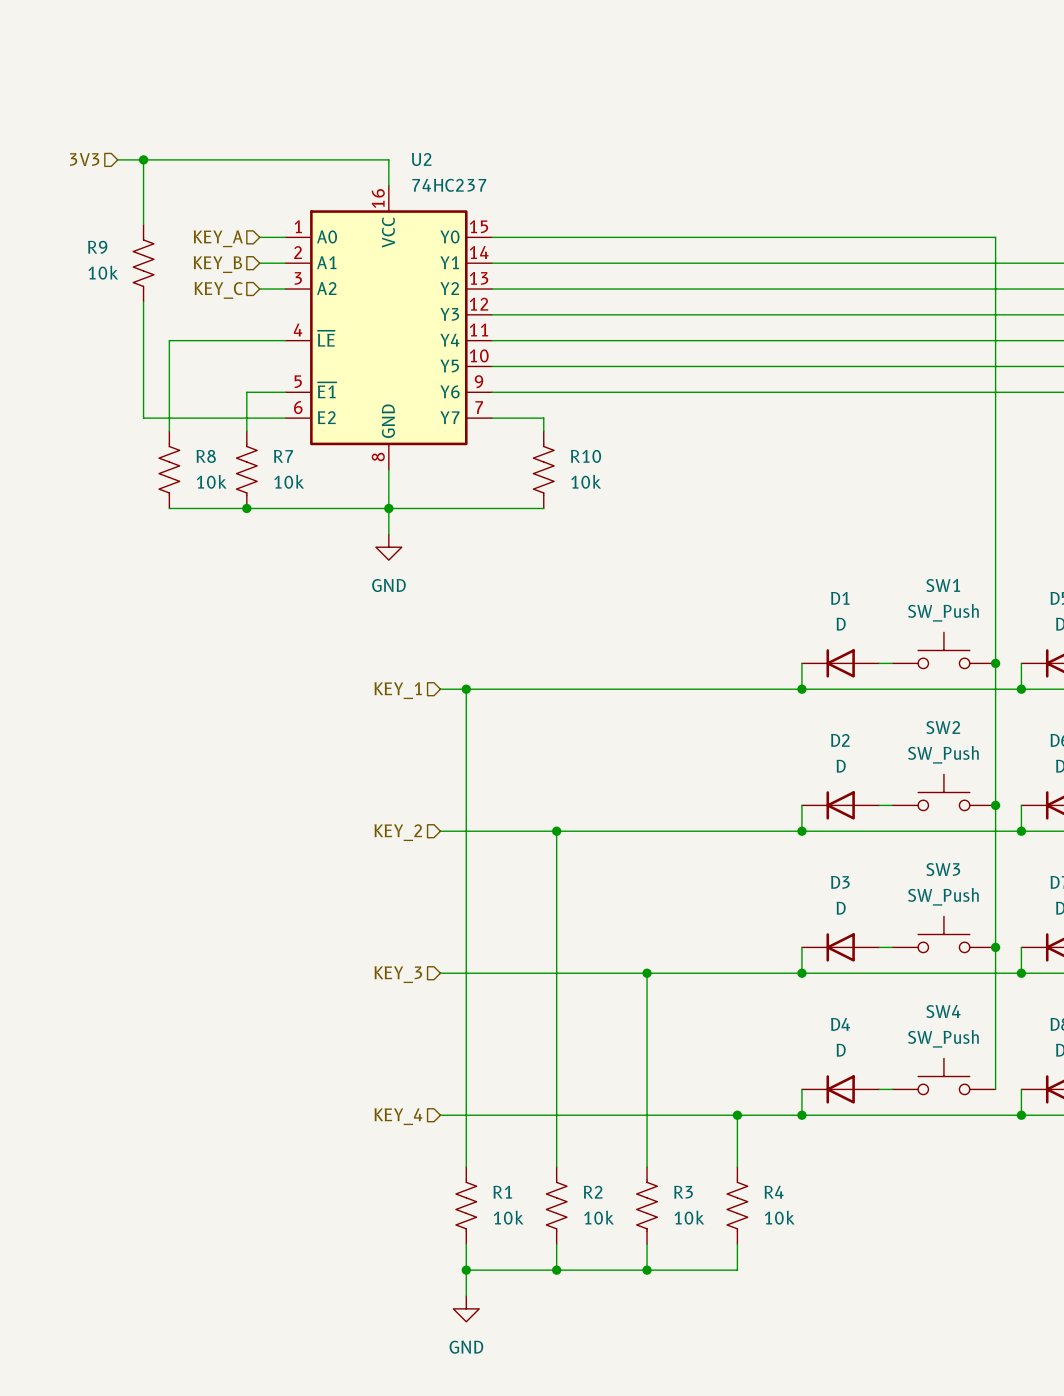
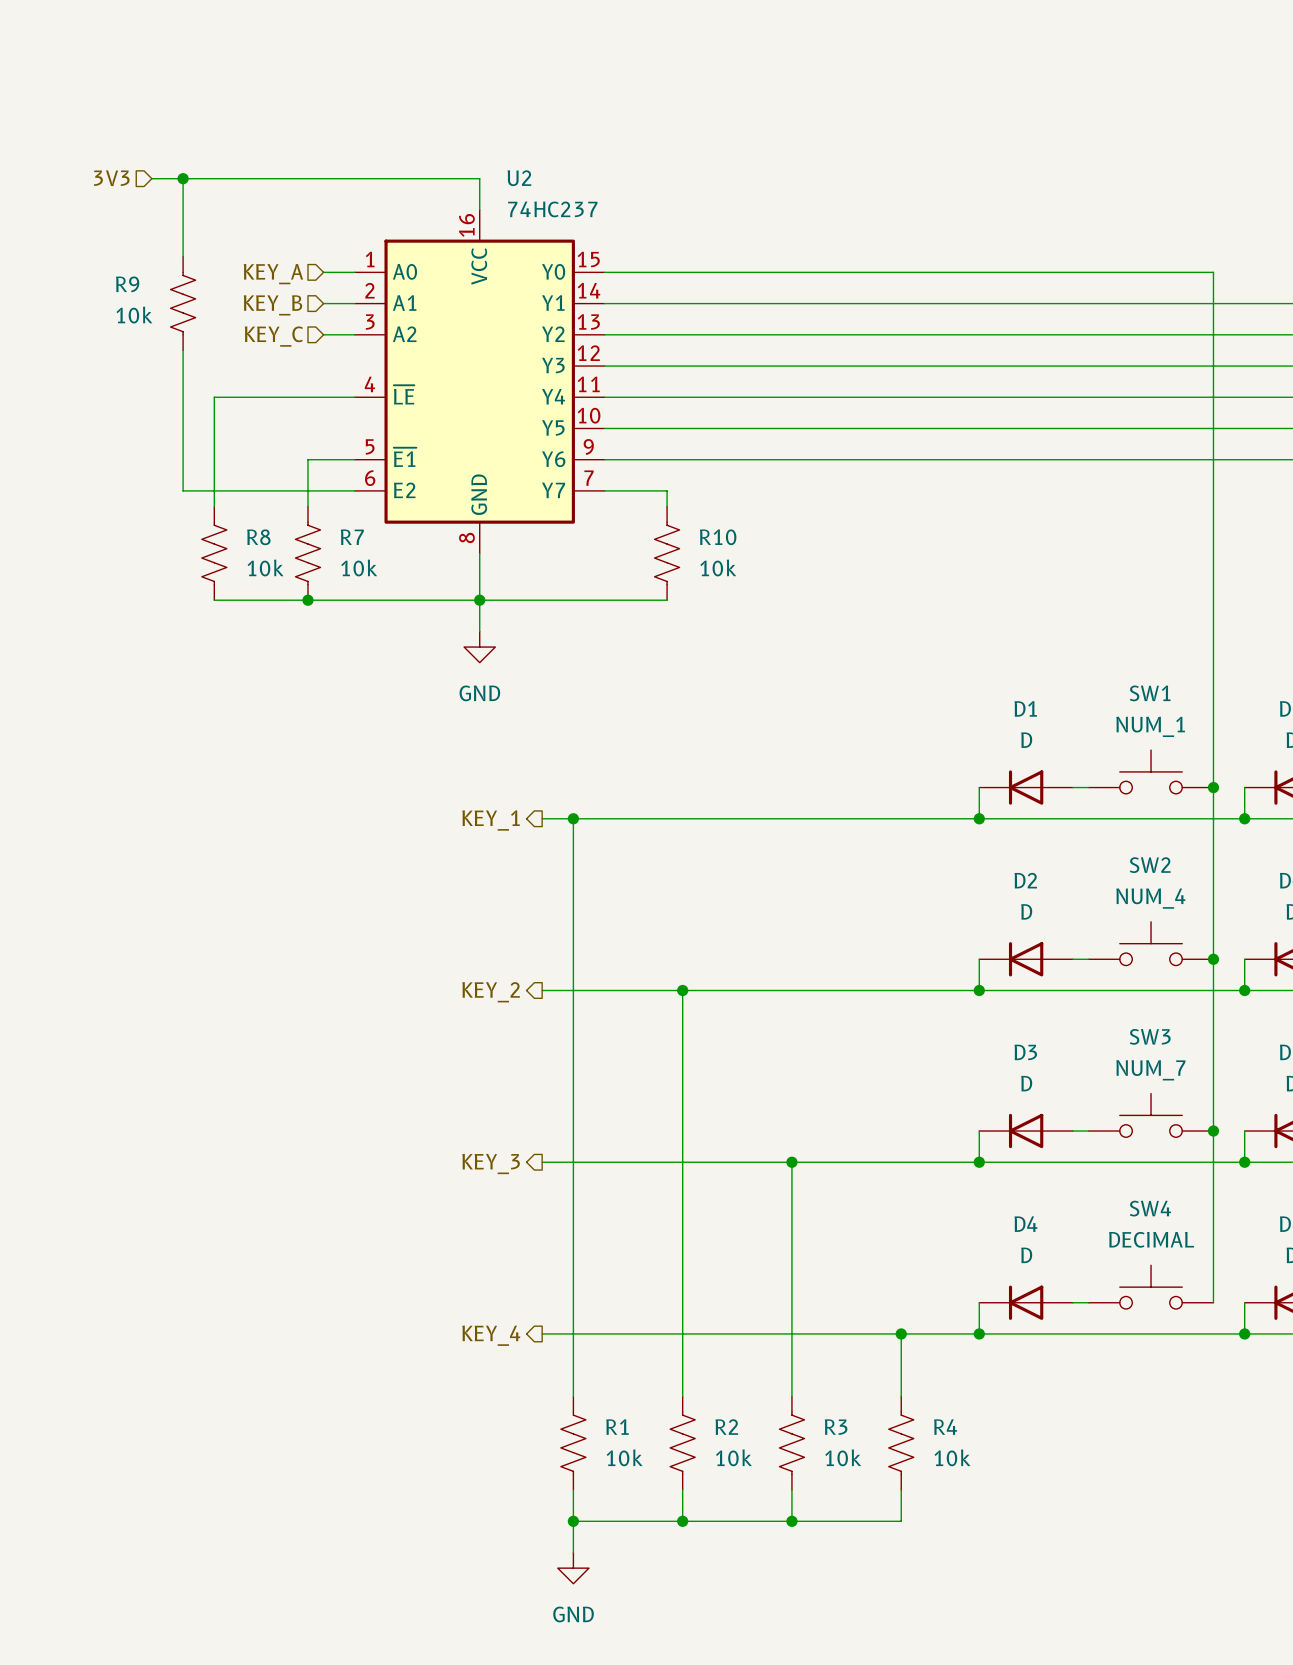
SW1 value: SW_Push (943, 612) -> NUM_1 (1150, 726)
hierarchical label shape: input (398, 690) -> output (491, 820)
SW2 value: SW_Push (943, 754) -> NUM_4 (1150, 898)
hierarchical label shape: input (398, 832) -> output (491, 992)
SW3 value: SW_Push (943, 896) -> NUM_7 (1150, 1070)
hierarchical label shape: input (398, 974) -> output (491, 1163)
SW4 value: SW_Push (943, 1038) -> DECIMAL (1151, 1239)
hierarchical label shape: input (398, 1116) -> output (491, 1335)

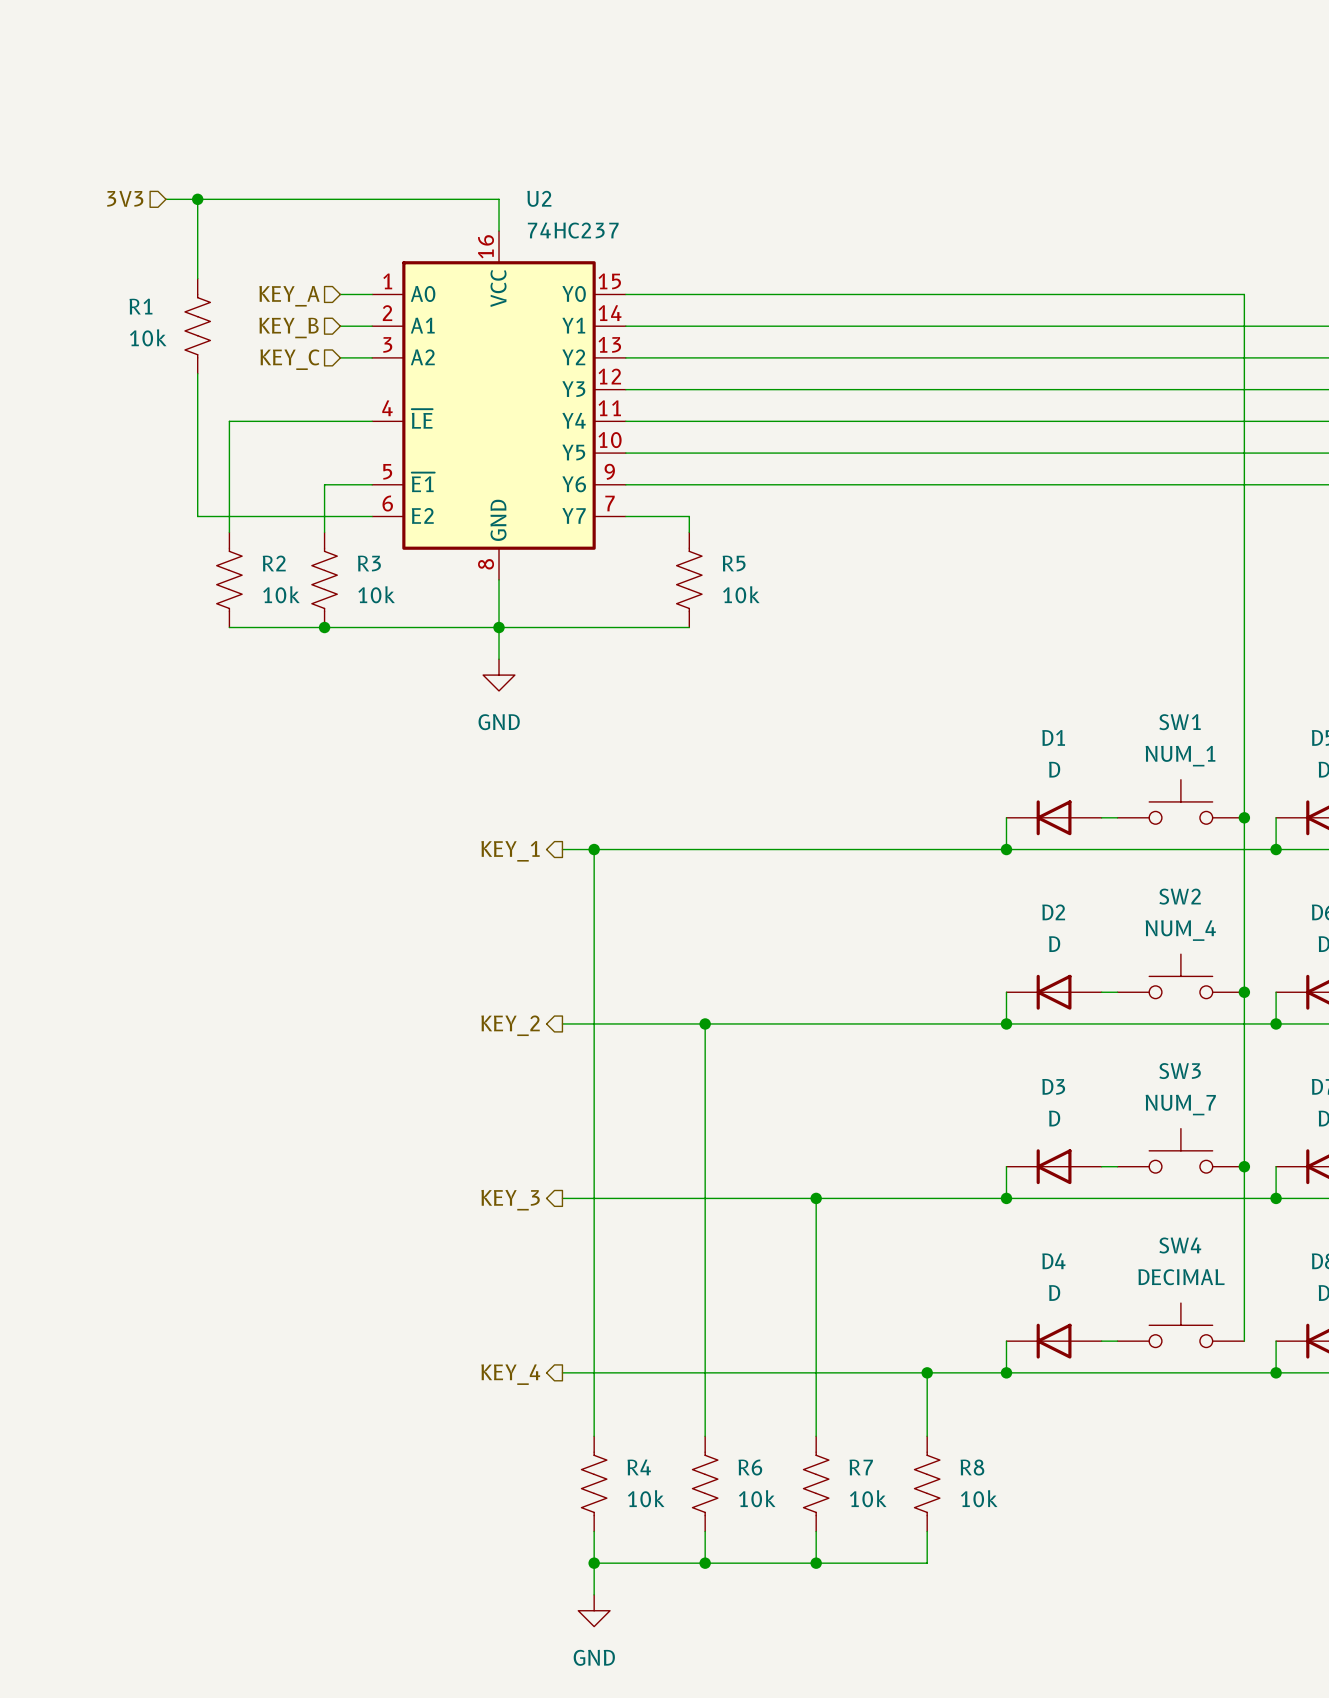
R9 name: R9 (127, 284) -> R1 (140, 306)
R8 name: R8 (258, 537) -> R2 (274, 563)
R7 name: R7 (352, 537) -> R3 (369, 563)
R10 name: R10 (718, 537) -> R5 (734, 563)
R1 name: R1 (617, 1427) -> R4 (639, 1467)
R2 name: R2 (726, 1427) -> R6 (750, 1467)
R3 name: R3 (836, 1427) -> R7 (861, 1467)
R4 name: R4 (945, 1427) -> R8 (972, 1467)

